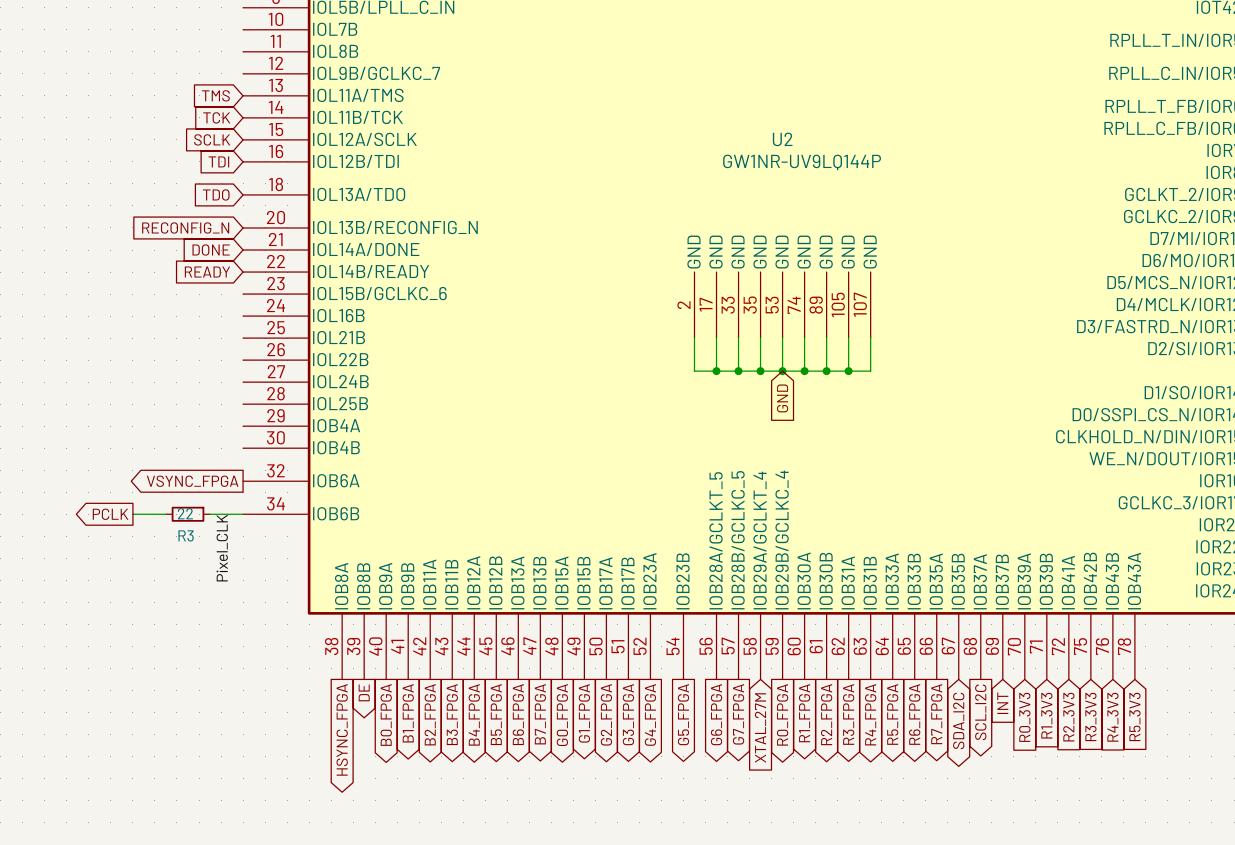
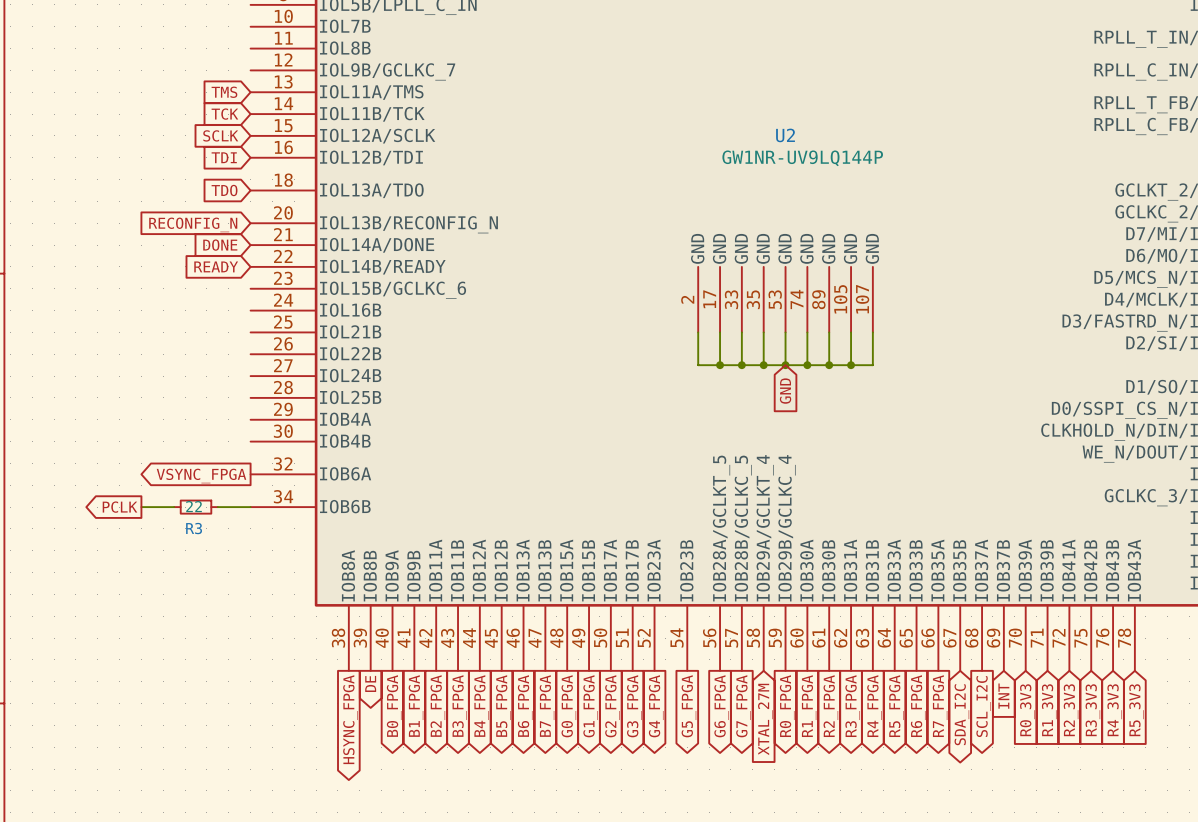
label: Pixel_CLK (222, 548) -> none

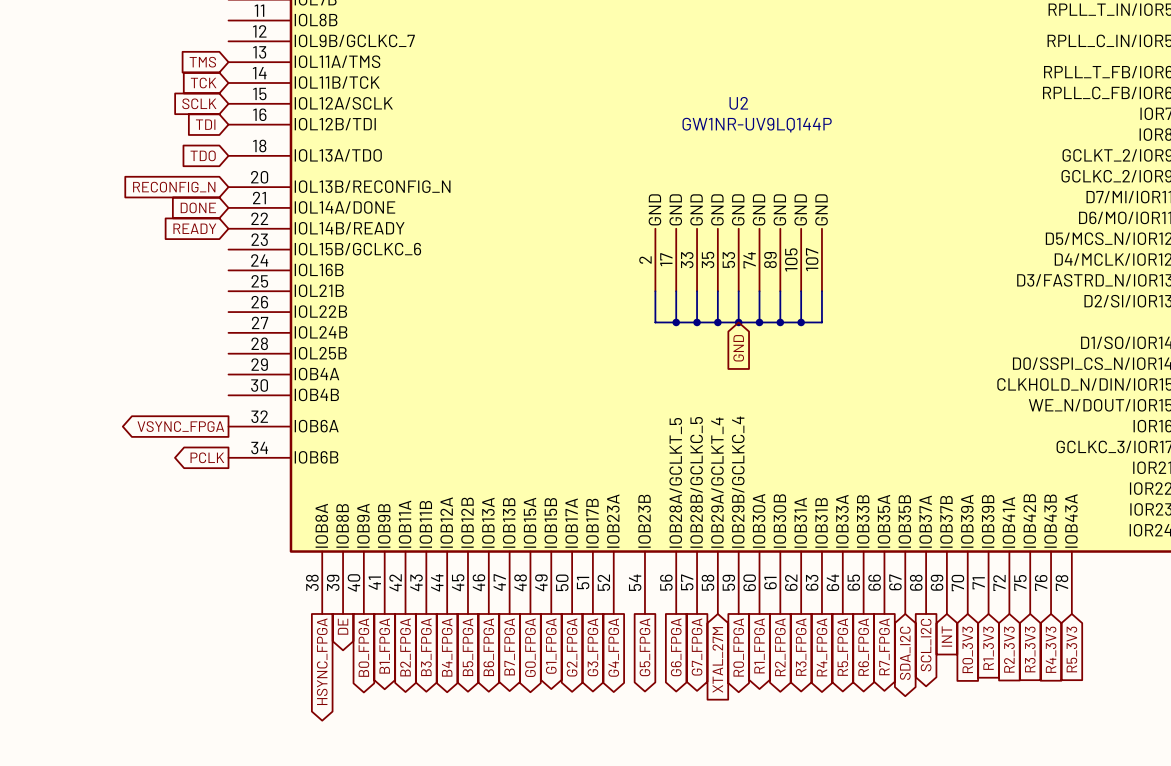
global label position: PCLK (119, 507) -> PCLK (207, 457)
wire: (141, 507) (174, 507) -> none
R3: 22 (196, 507) -> none
wire: (217, 507) (250, 507) -> none

